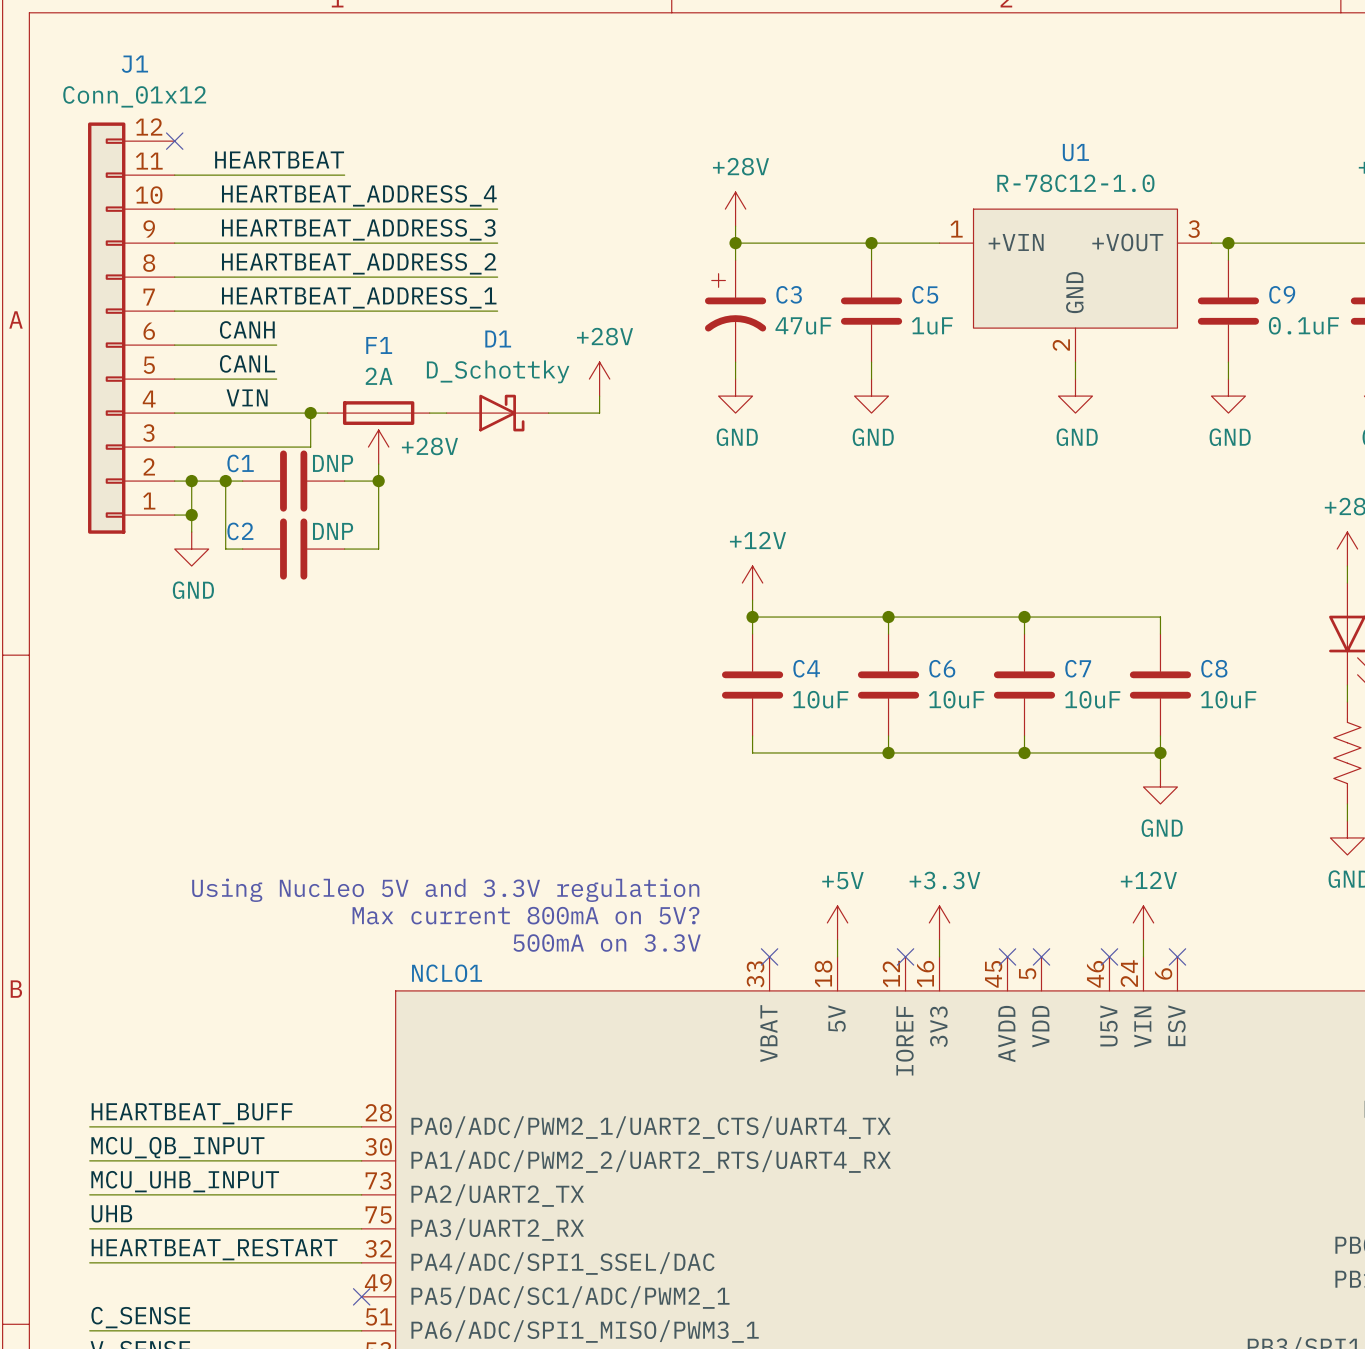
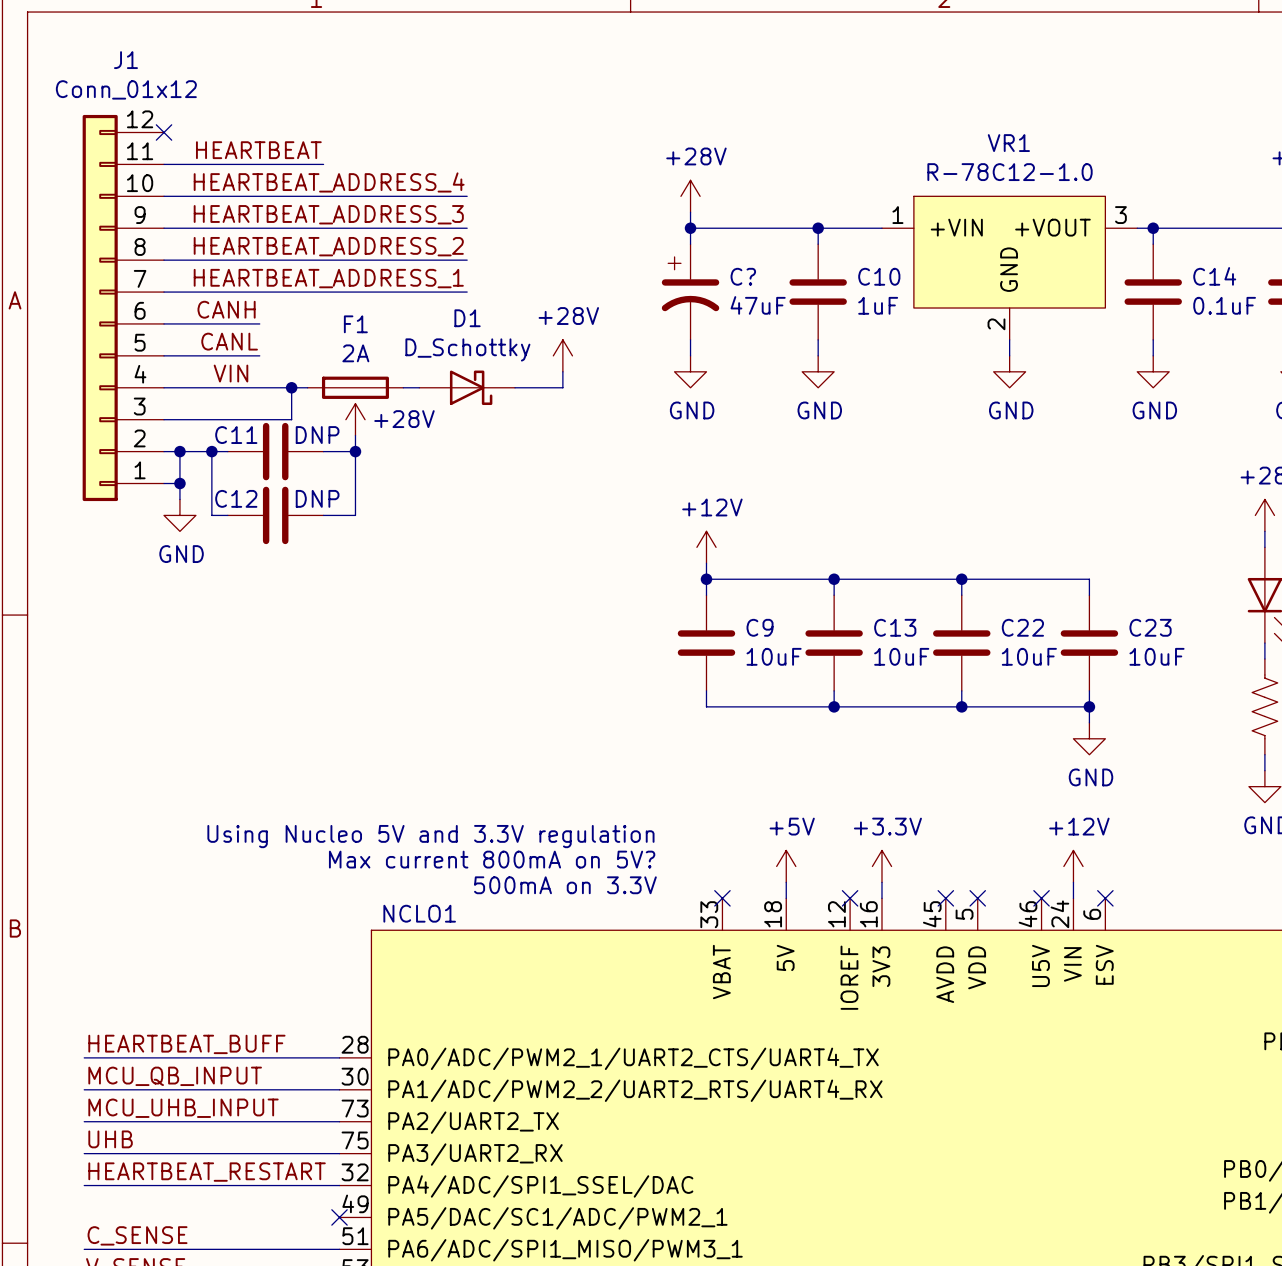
U1 name: U1 (1075, 152) -> VR1 (1008, 143)
C3 name: C3 (789, 294) -> C? (743, 276)
C5 name: C5 (925, 294) -> C10 (879, 276)
C9 name: C9 (1282, 294) -> C14 (1214, 276)
C1 name: C1 (240, 463) -> C11 (236, 435)
C2 name: C2 (240, 531) -> C12 (236, 498)
C4 name: C4 (806, 668) -> C9 (760, 627)
C6 name: C6 (942, 668) -> C13 (895, 627)
C7 name: C7 (1078, 668) -> C22 (1022, 627)
C8 name: C8 (1214, 668) -> C23 (1150, 627)

